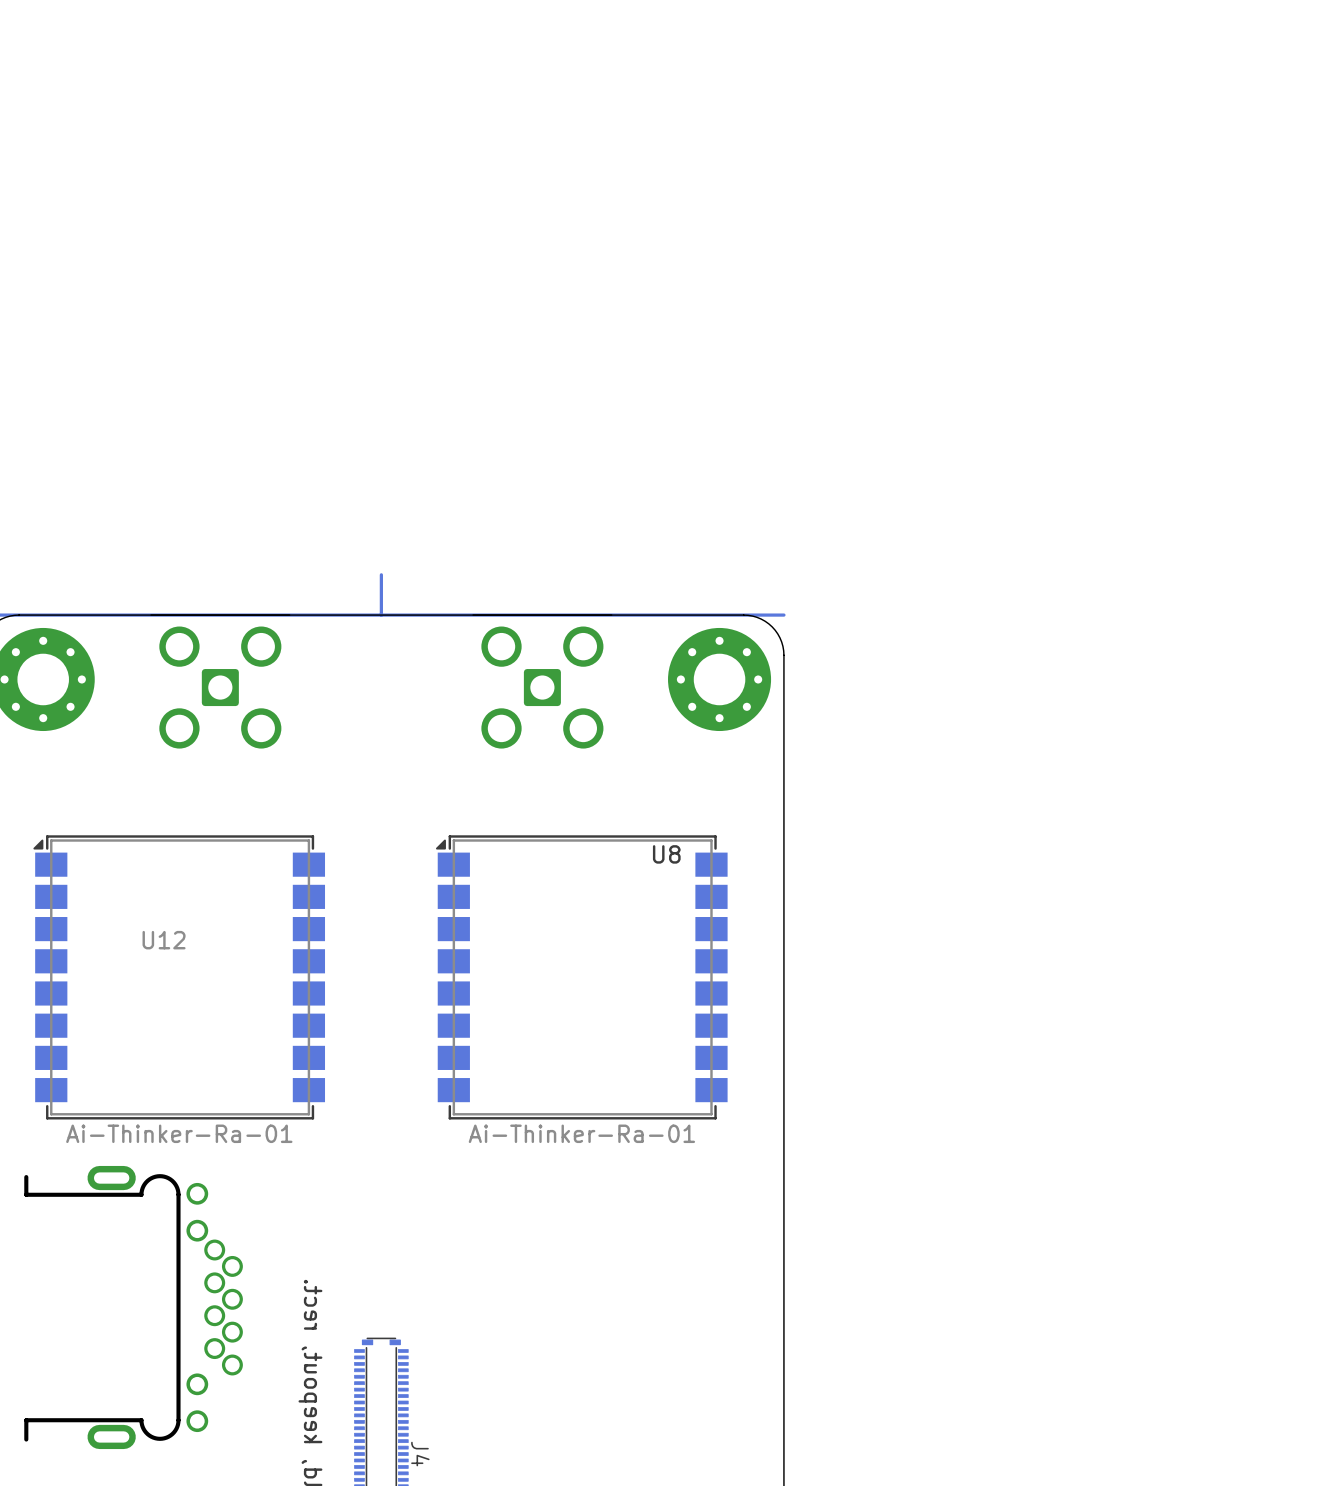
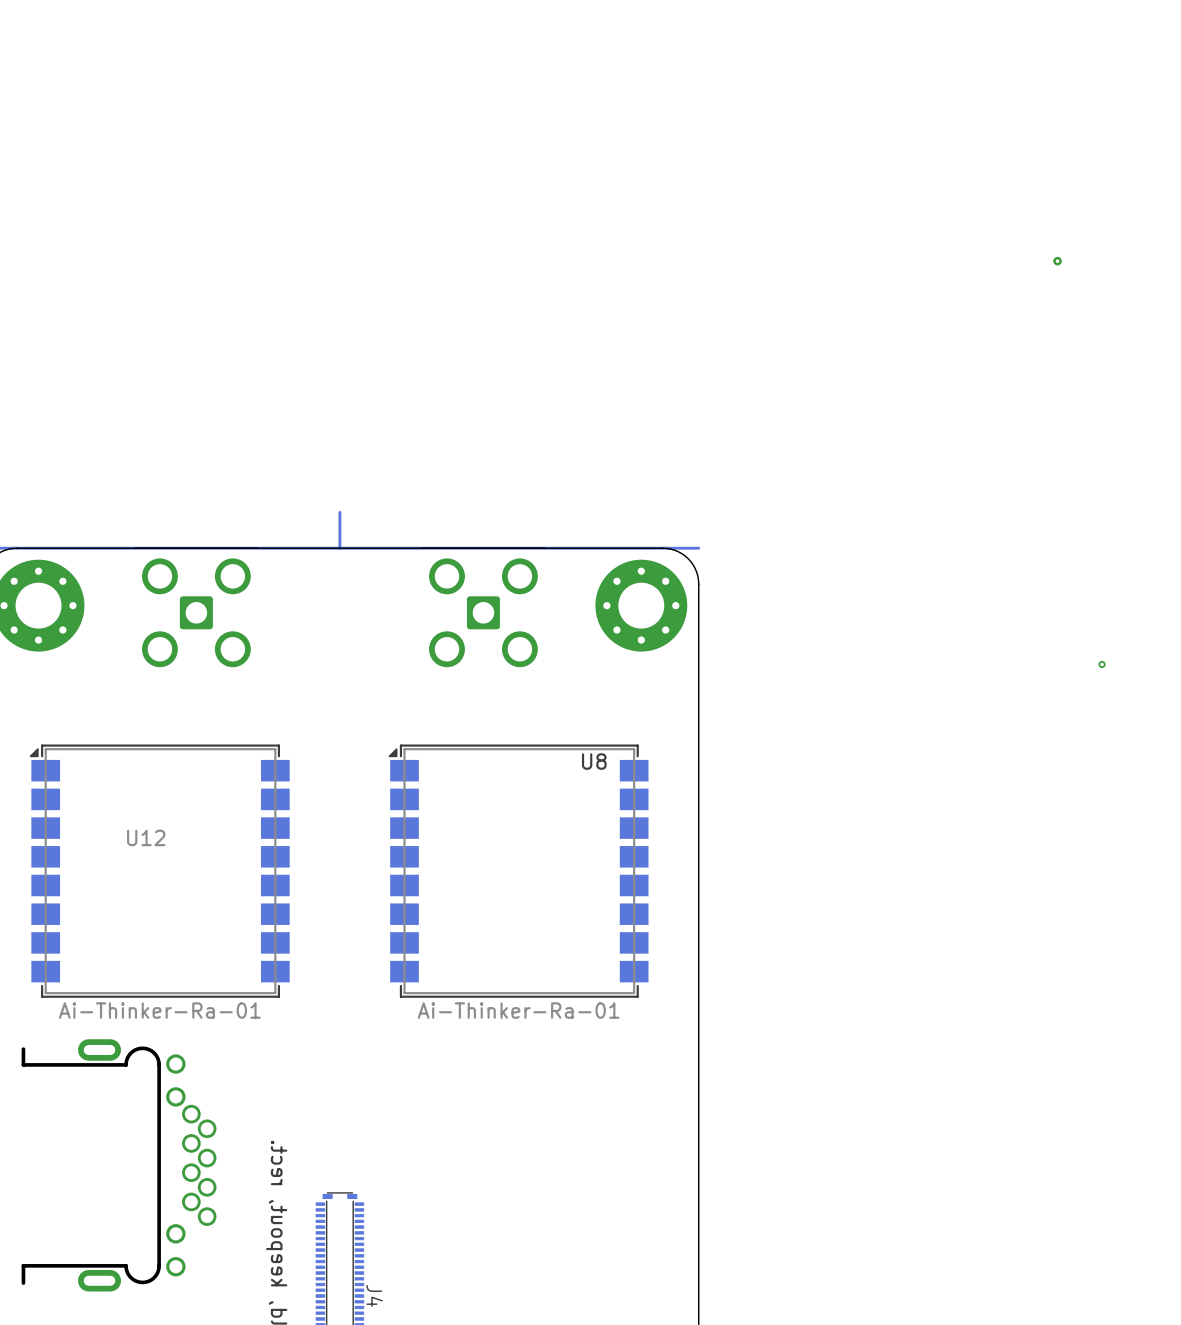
via: none -> (1057, 261)
via: none -> (1102, 664)

